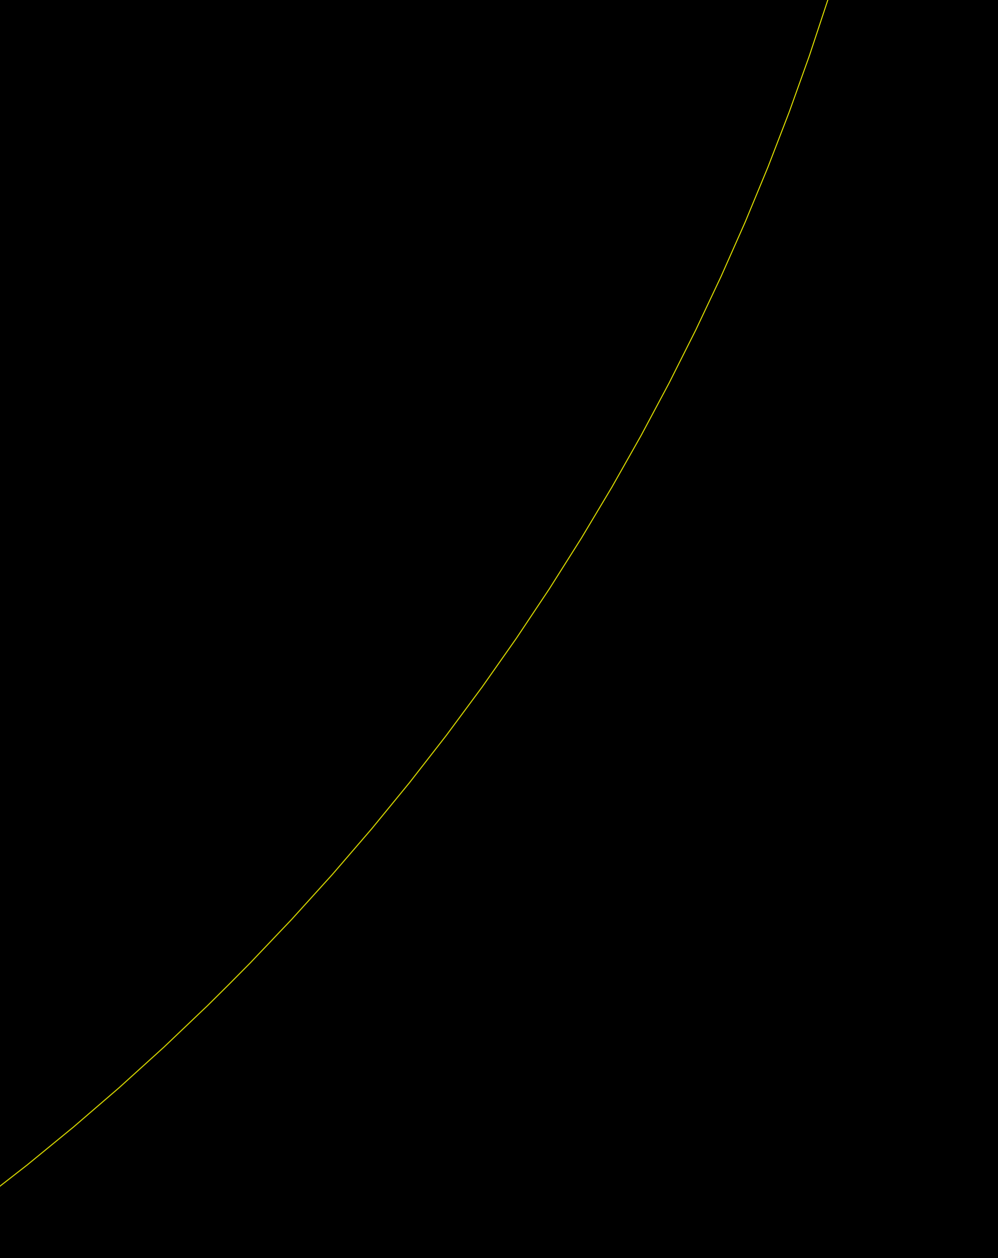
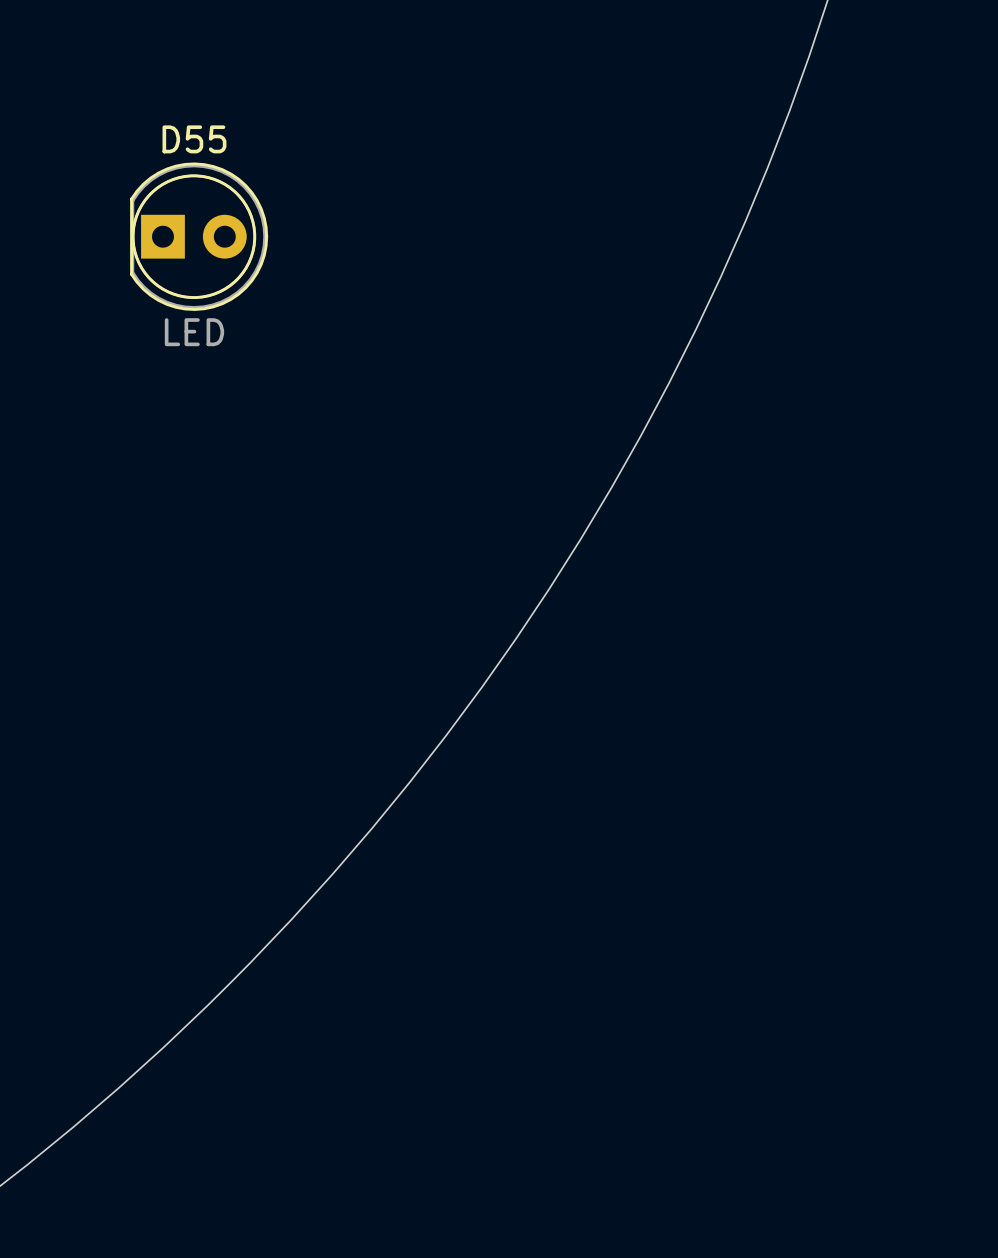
D55: none -> LED (199, 236)

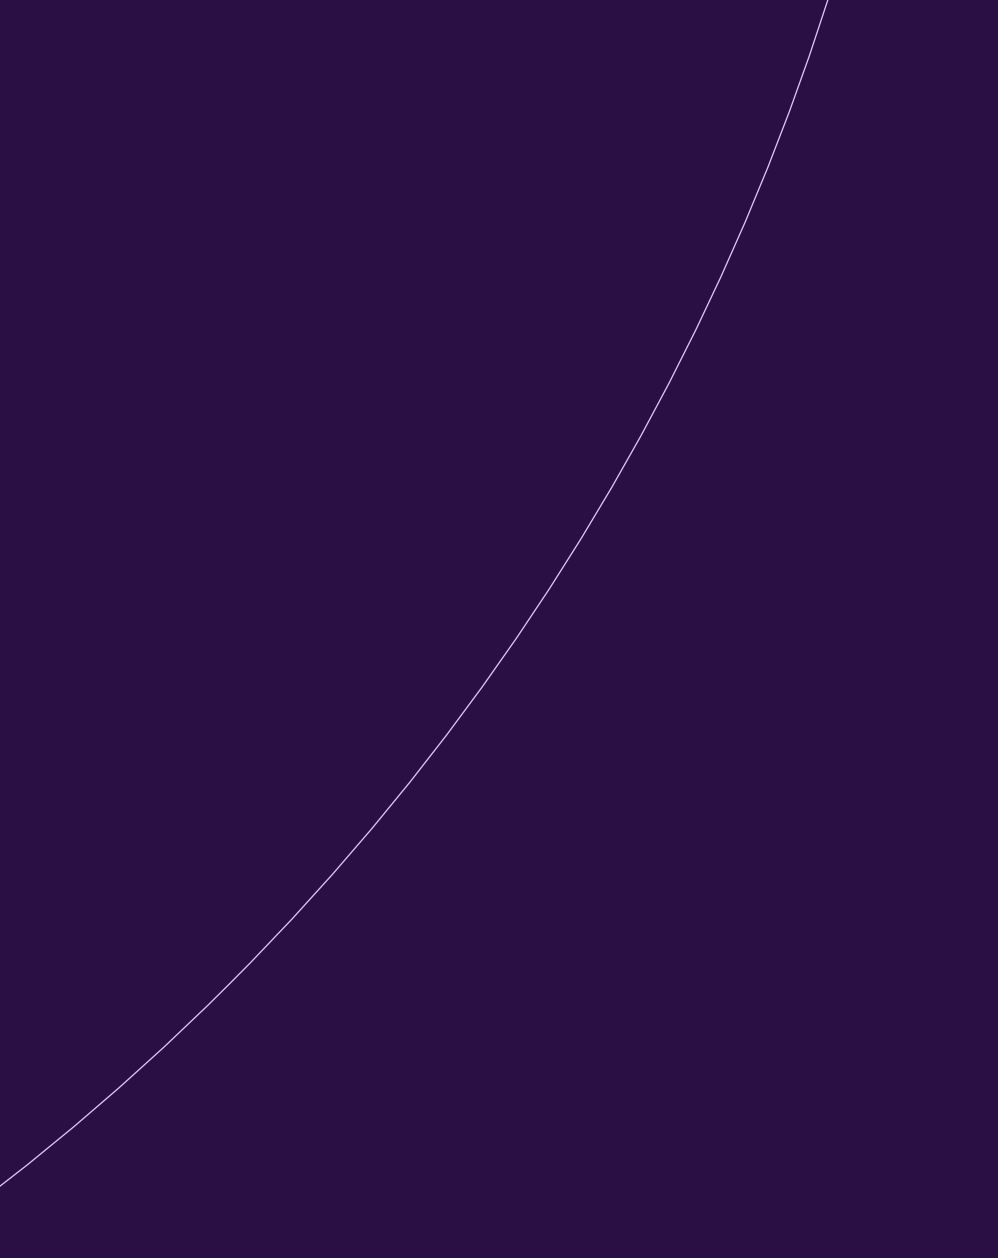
D55: LED (199, 236) -> none

